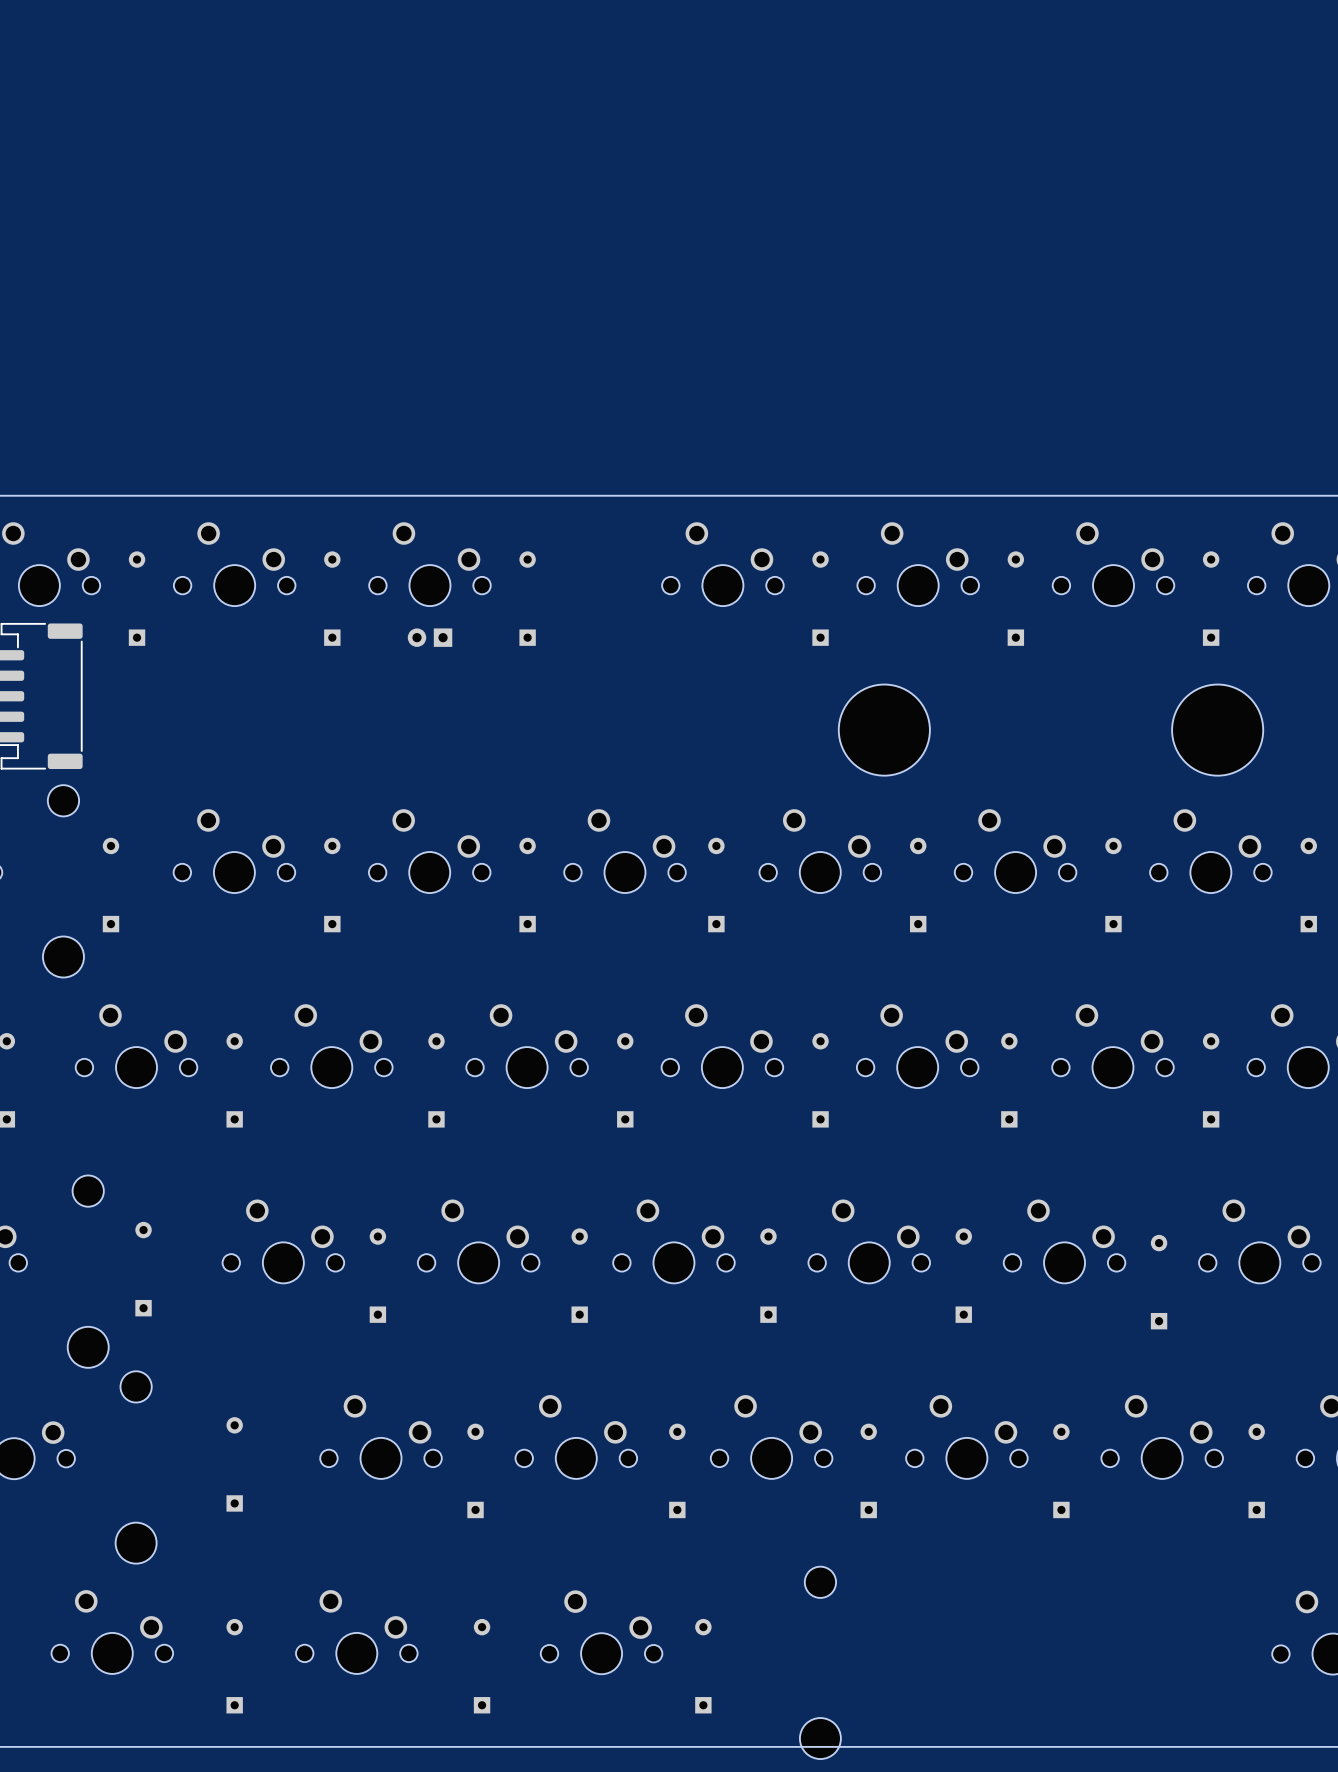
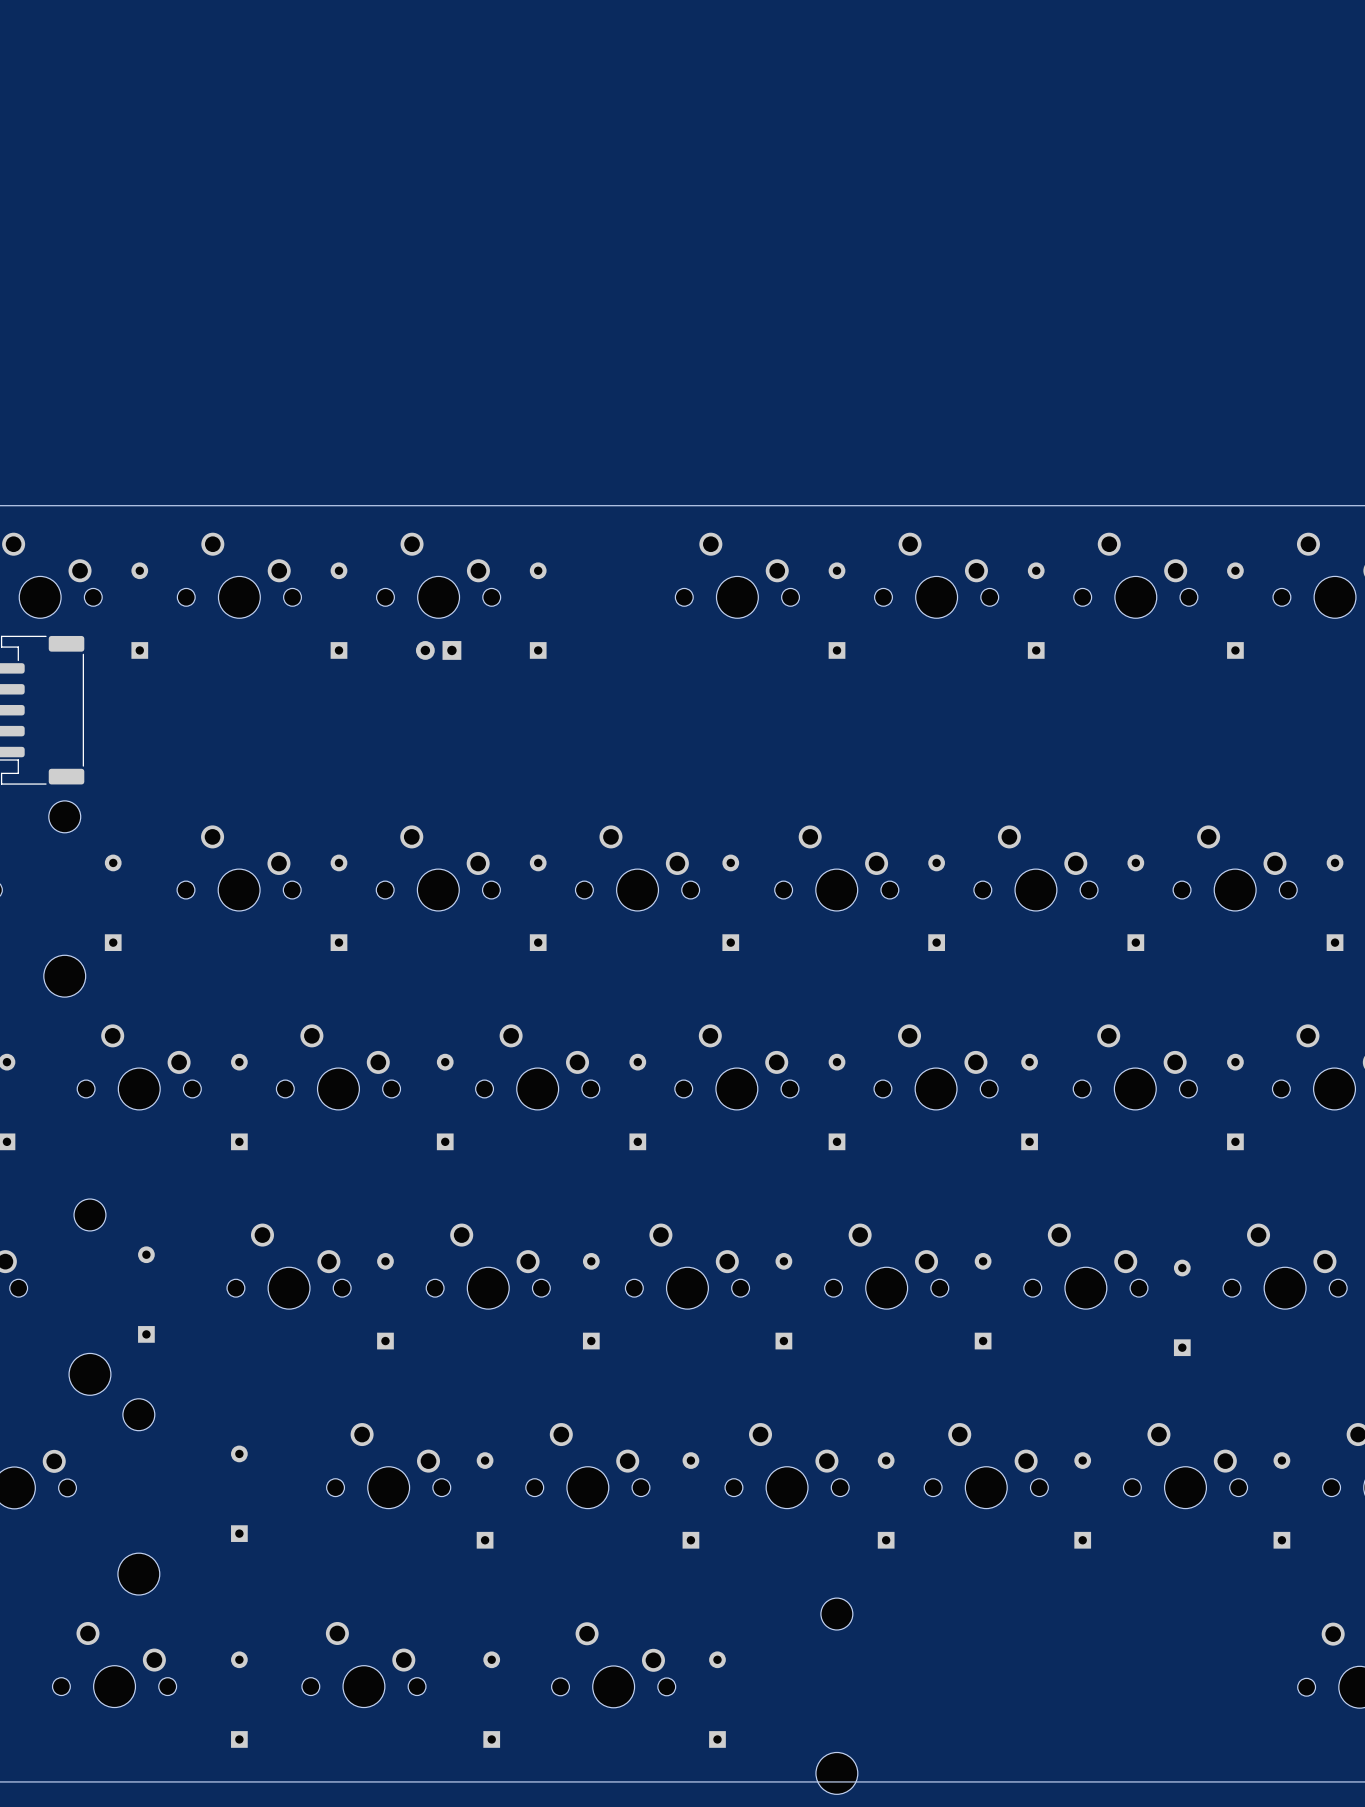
part: (884, 730) -> none
part: (1217, 730) -> none

